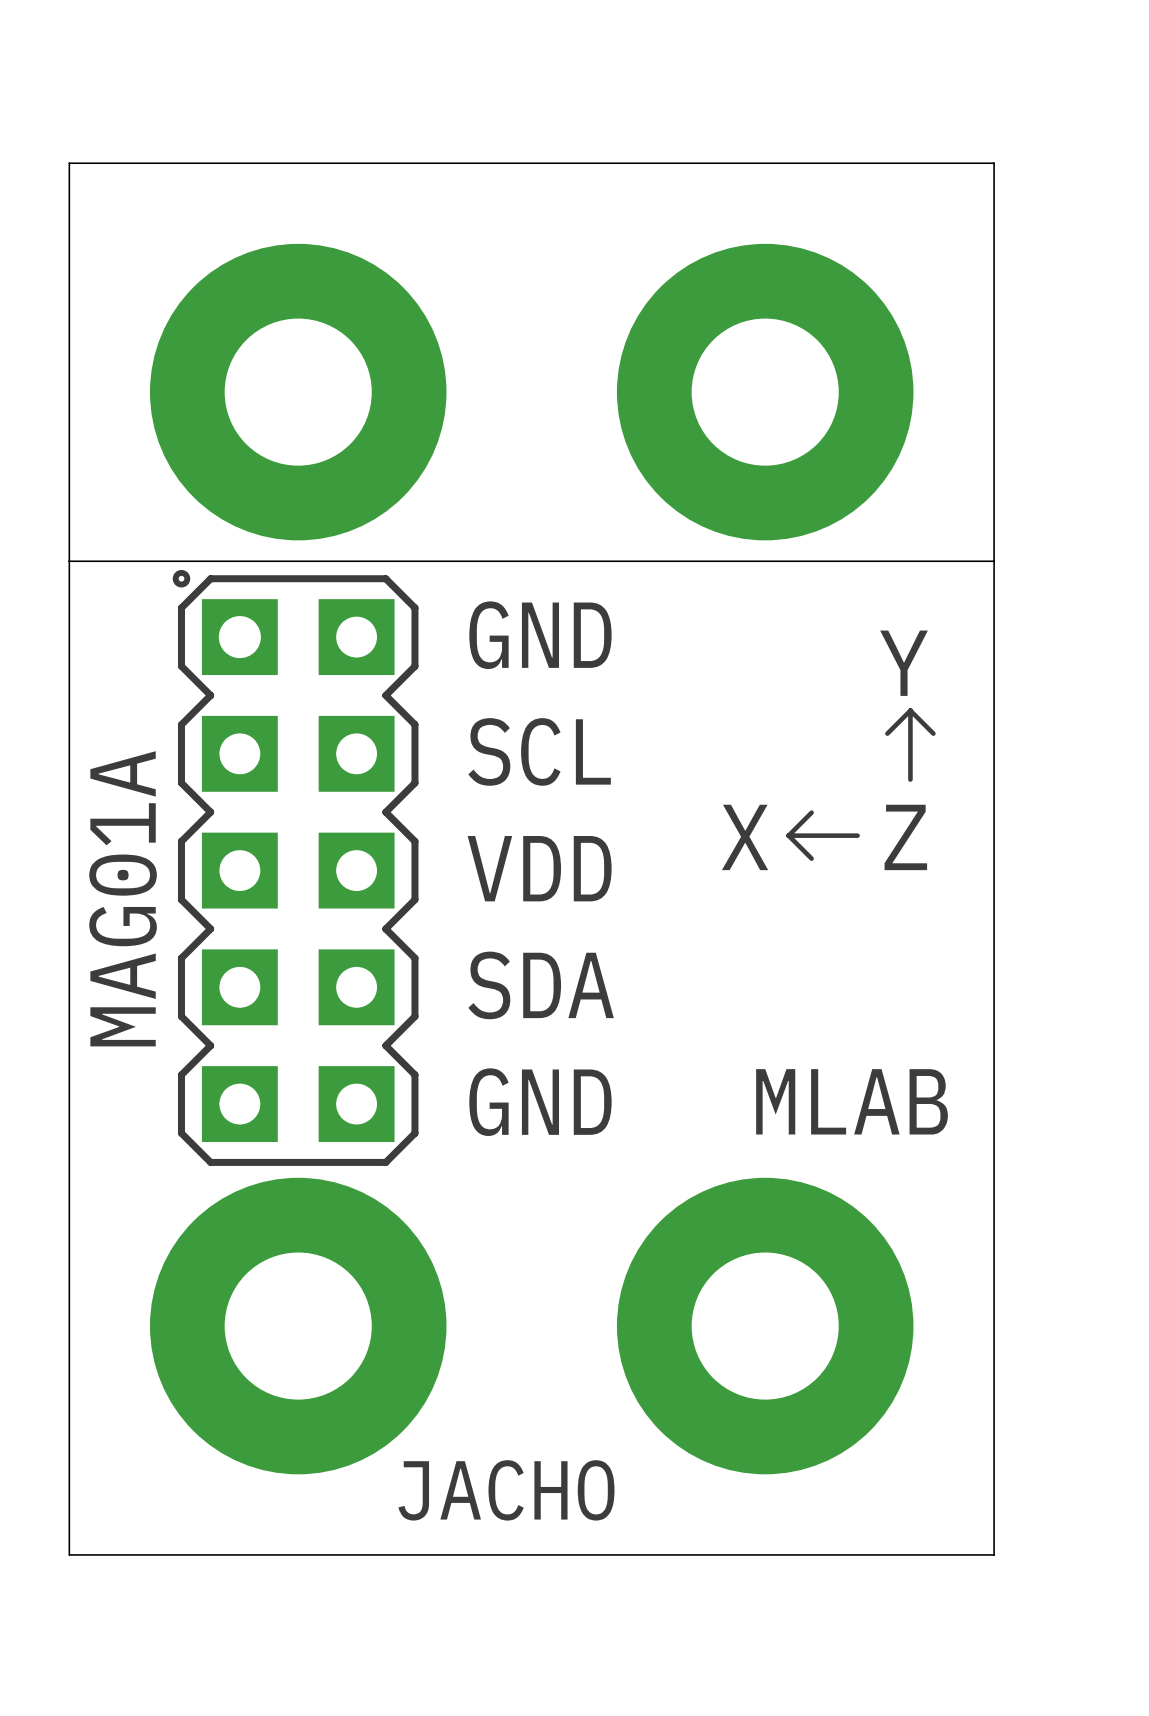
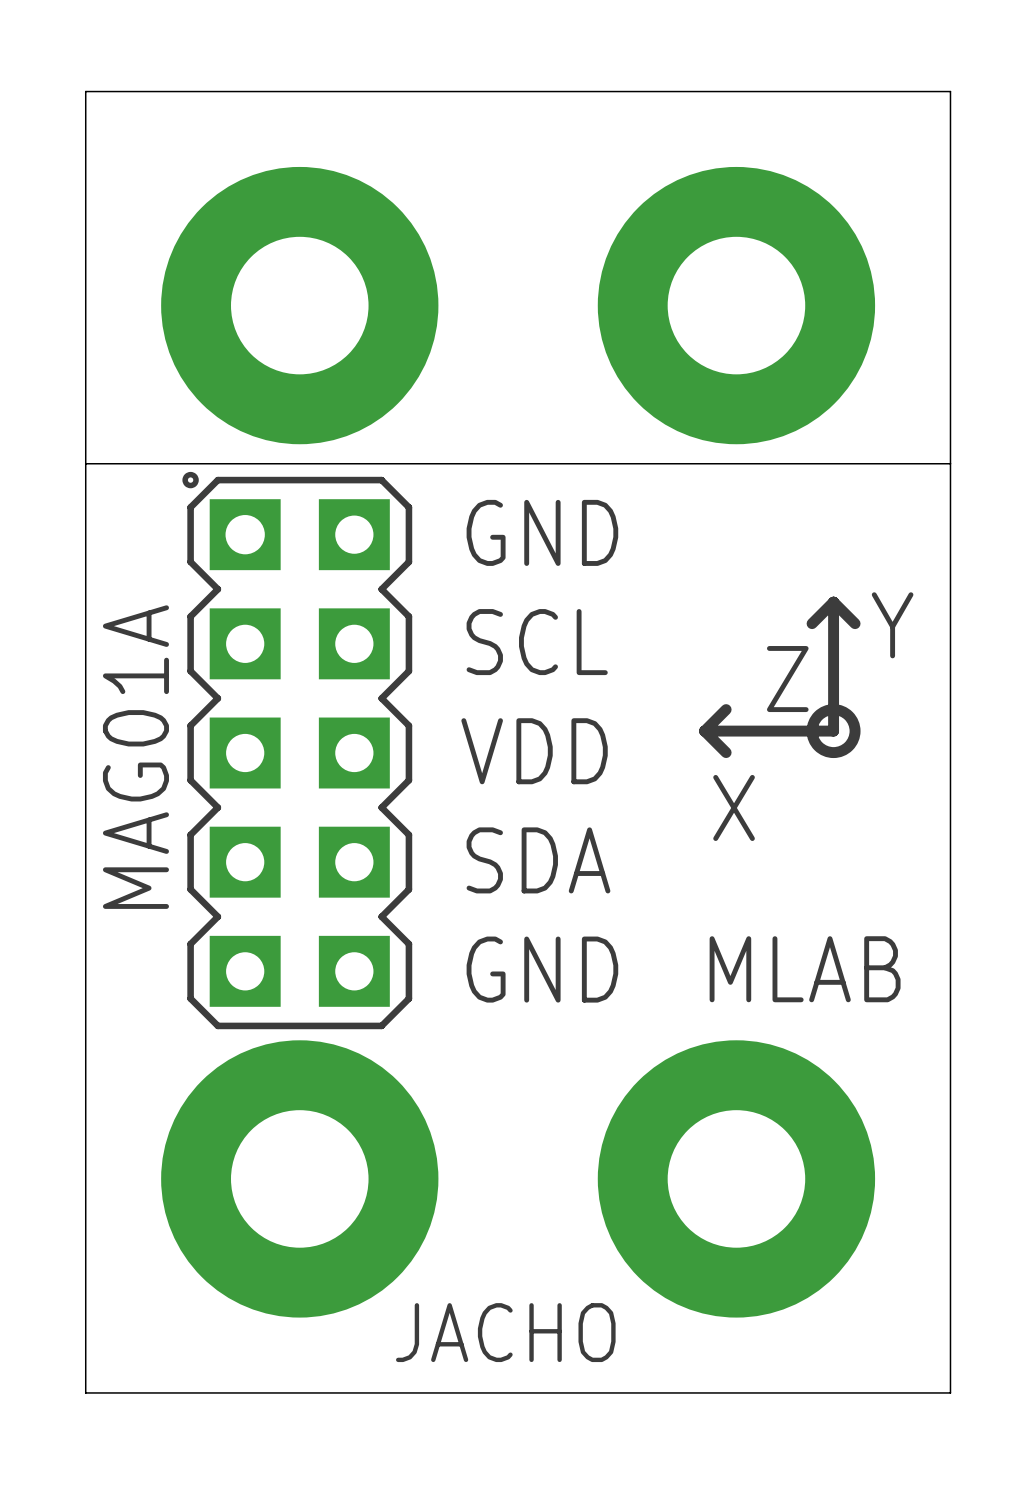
text position: Y (904, 663) -> Y (892, 625)
line: none -> (833, 602) (833, 731) (704, 731)
line: (910, 710) (933, 733) -> (833, 602) (855, 623)
line: (910, 710) (887, 733) -> (833, 602) (812, 623)
line: (910, 710) (910, 779) -> none
line: (811, 812) (788, 835) -> (726, 709) (704, 731)
drawing: none -> [806, 704, 861, 759]
line: (788, 835) (811, 858) -> (704, 731) (726, 752)
line: (788, 835) (857, 835) -> none
text position: X (745, 837) -> X (734, 807)
text position: Z (905, 837) -> Z (787, 679)

